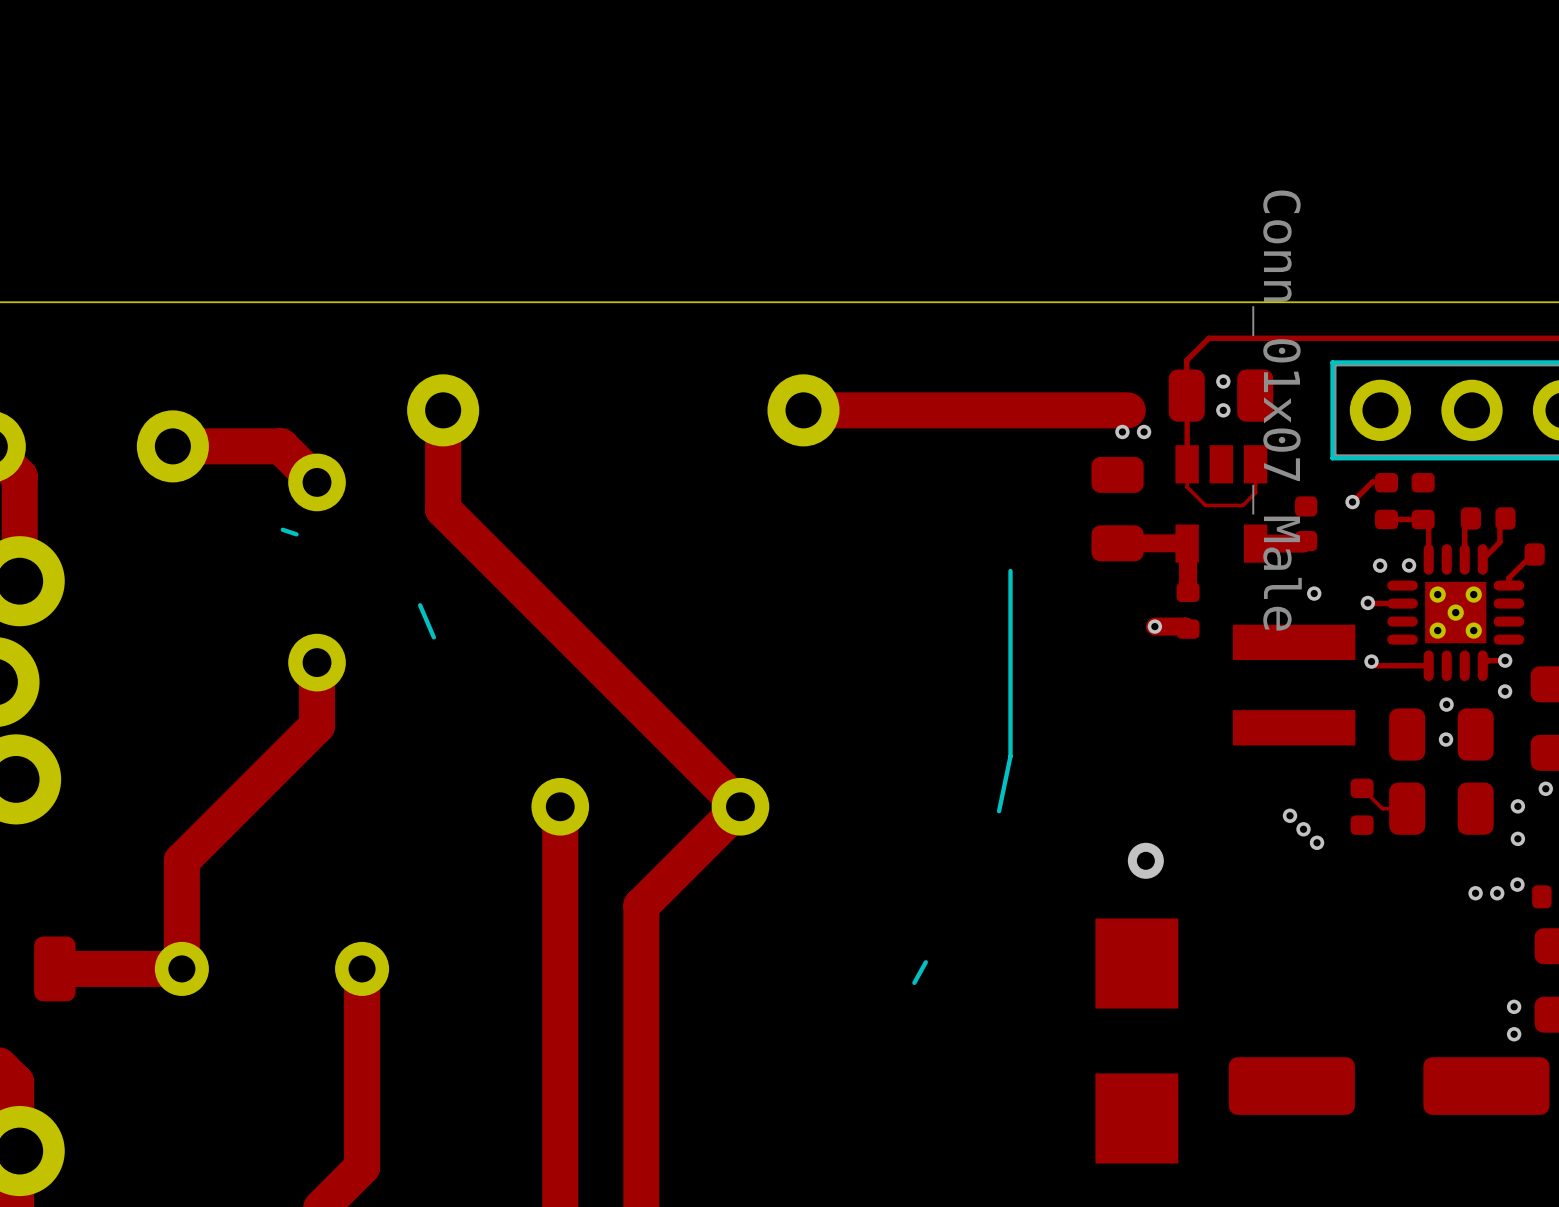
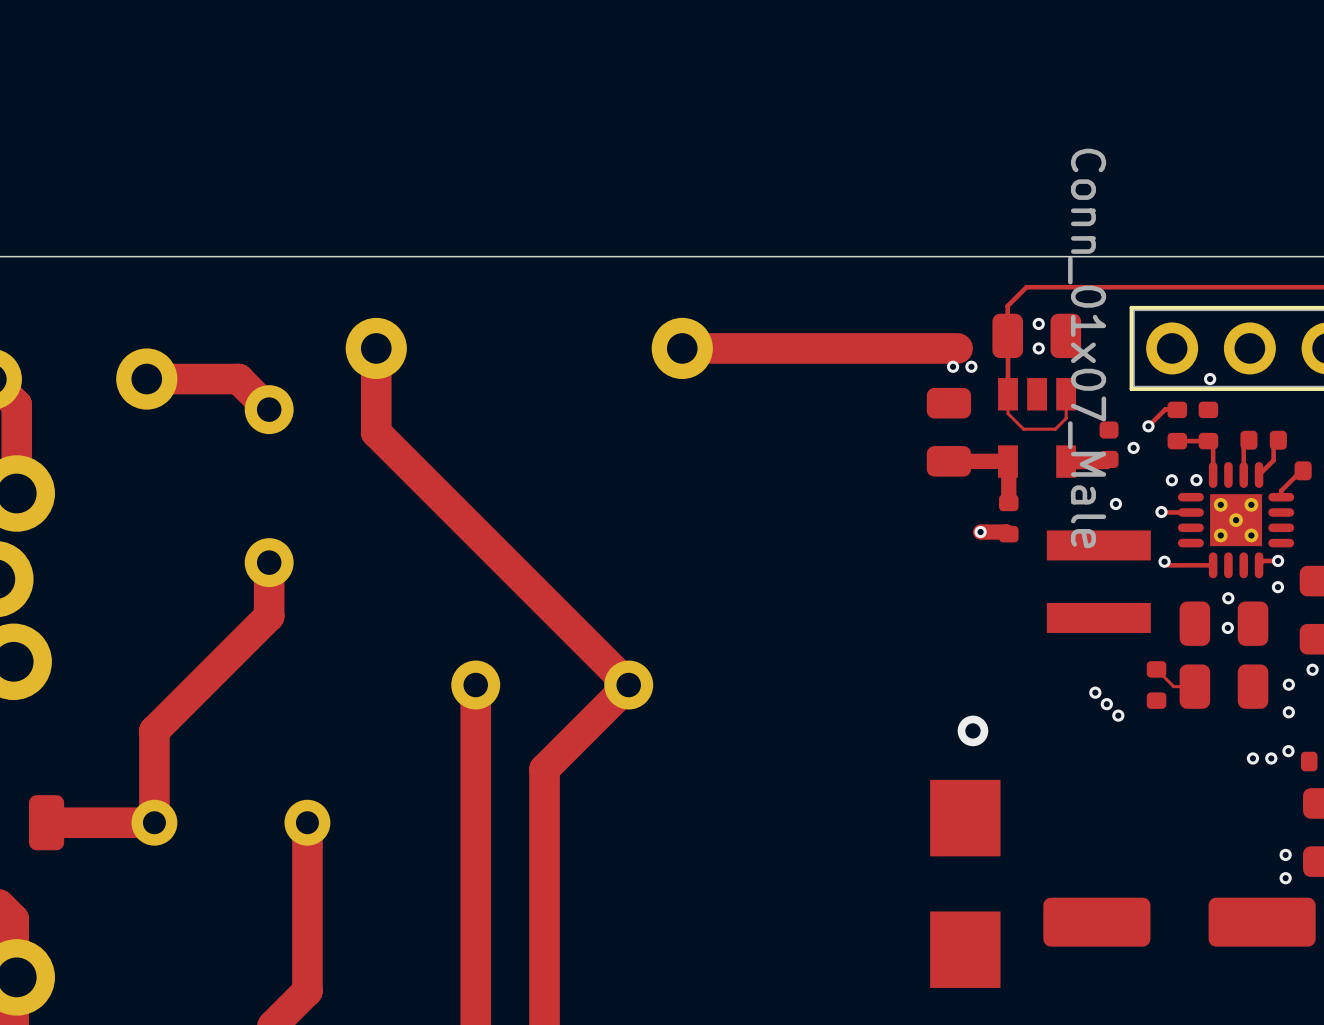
via: none -> (1210, 379)
via: none -> (1133, 447)
line: (282, 529) (296, 534) -> none
line: (1010, 570) (1010, 756) (999, 811) -> none
line: (420, 605) (433, 637) -> none
line: (925, 962) (914, 982) -> none

